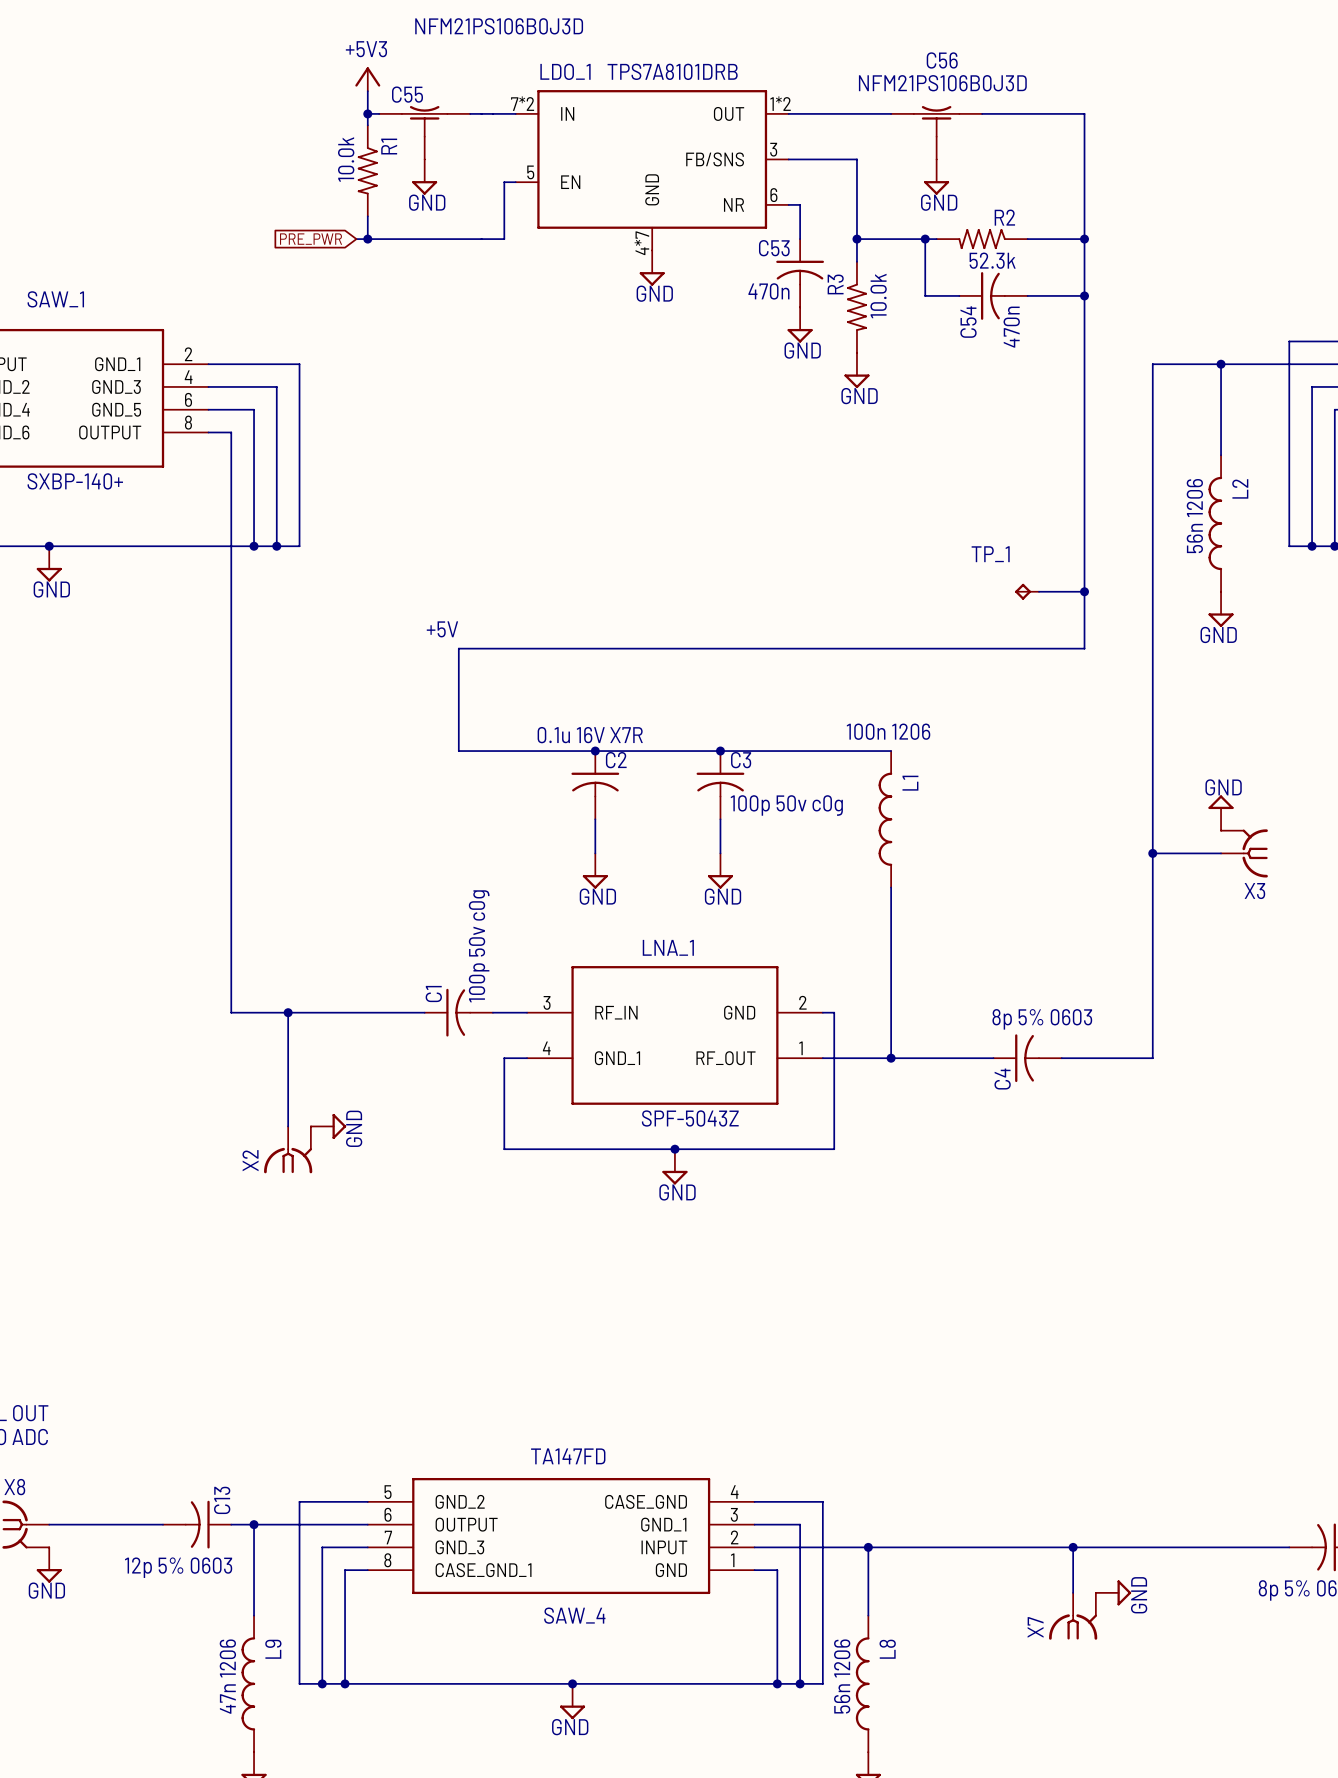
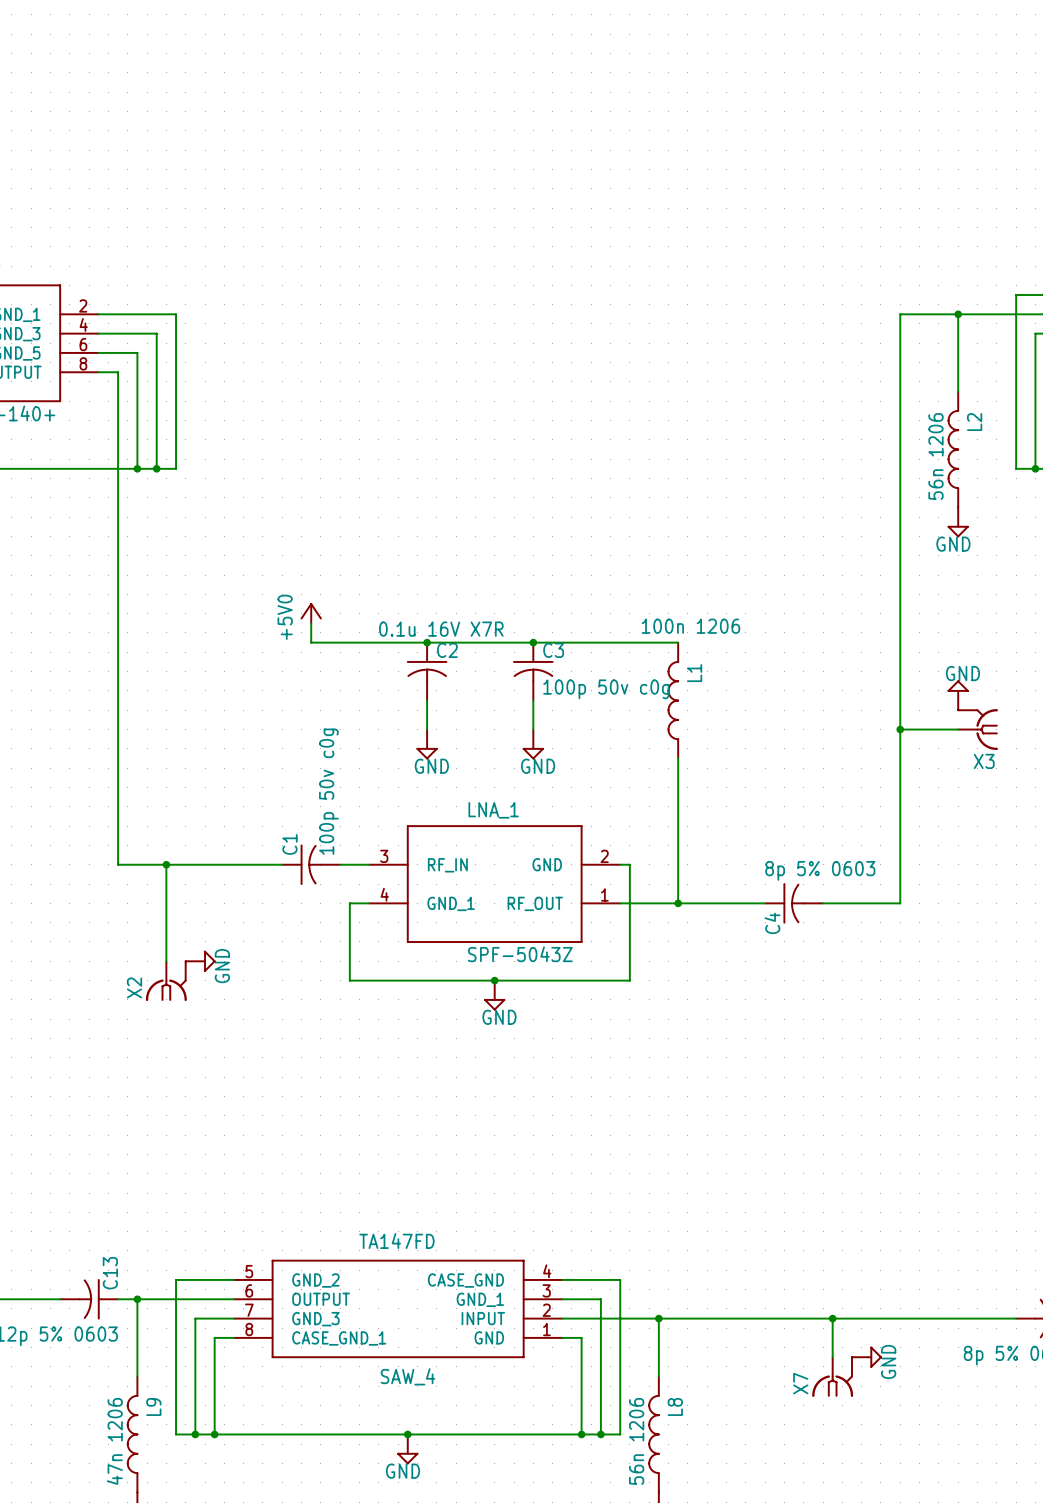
power symbol: +5V3 (367, 79) -> none
wire: (367, 91) (367, 125) -> none
wire: (367, 113) (379, 113) -> none
junction: (367, 113) -> none
wire: (470, 113) (515, 113) -> none
wire: (788, 113) (891, 113) -> none
wire: (982, 113) (1084, 113) (1084, 648) (458, 648) (458, 728) -> none
C55: NFM21PS106B0J3D (424, 132) -> none
C56: NFM21PS106B0J3D (936, 132) -> none
wire: (788, 159) (856, 159) (856, 261) -> none
R1: 10.0k (367, 170) -> none
LDO_1: TPS7A8101DRB (652, 170) -> none
power symbol: GND (424, 177) -> none
power symbol: GND (936, 177) -> none
wire: (515, 182) (504, 182) (504, 239) (356, 239) -> none
wire: (788, 204) (800, 204) (800, 239) -> none
wire: (367, 216) (367, 239) -> none
global label: PRE_PWR (311, 239) -> none
junction: (367, 239) -> none
wire: (856, 239) (936, 239) -> none
junction: (856, 239) -> none
wire: (925, 239) (925, 295) (959, 295) -> none
junction: (925, 239) -> none
R2: 52.3k (982, 239) -> none
wire: (1027, 239) (1084, 239) -> none
junction: (1084, 239) -> none
power symbol: GND (652, 268) -> none
C53: 470n (800, 273) -> none
C54: 470n (993, 295) -> none
wire: (1027, 295) (1084, 295) -> none
junction: (1084, 295) -> none
R3: 10.0k (856, 307) -> none
power symbol: GND (800, 324) -> none
power symbol: GND (856, 370) -> none
TP_1: (1027, 591) -> none
wire: (1039, 591) (1084, 591) -> none
junction: (1084, 591) -> none
text: +5V (442, 629) -> none
power symbol: none -> +5V0 (311, 613)

